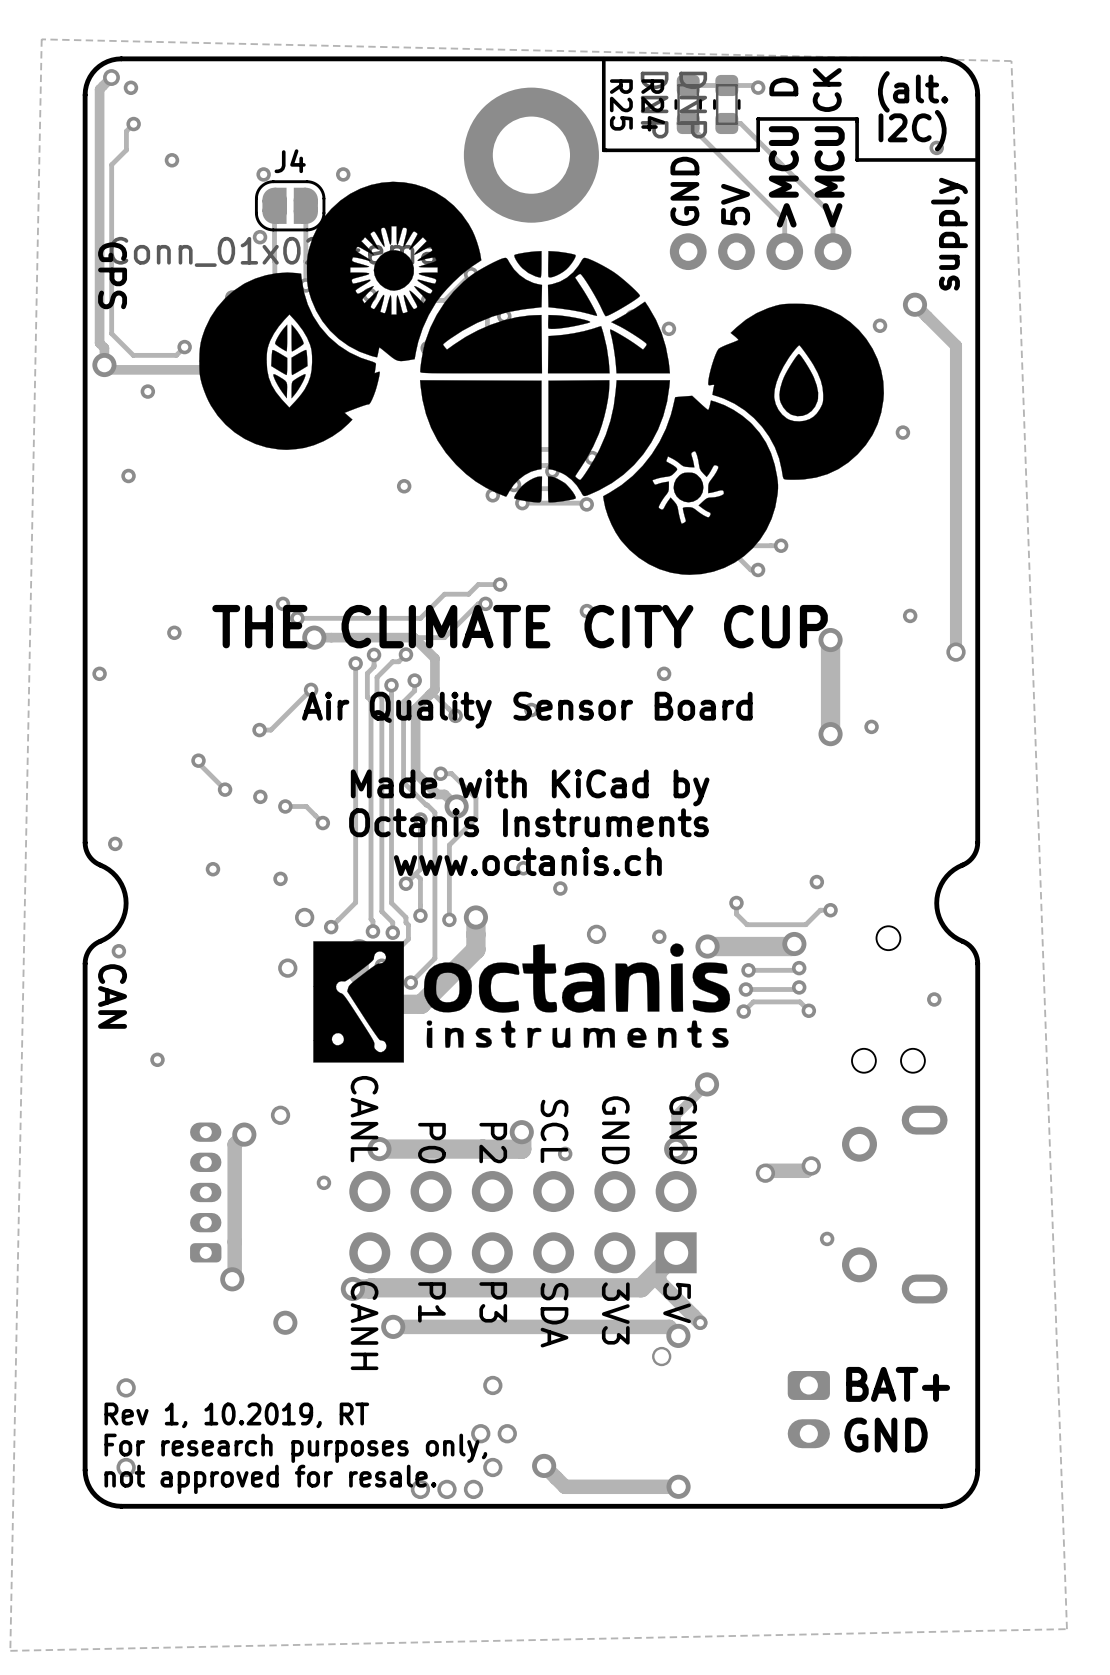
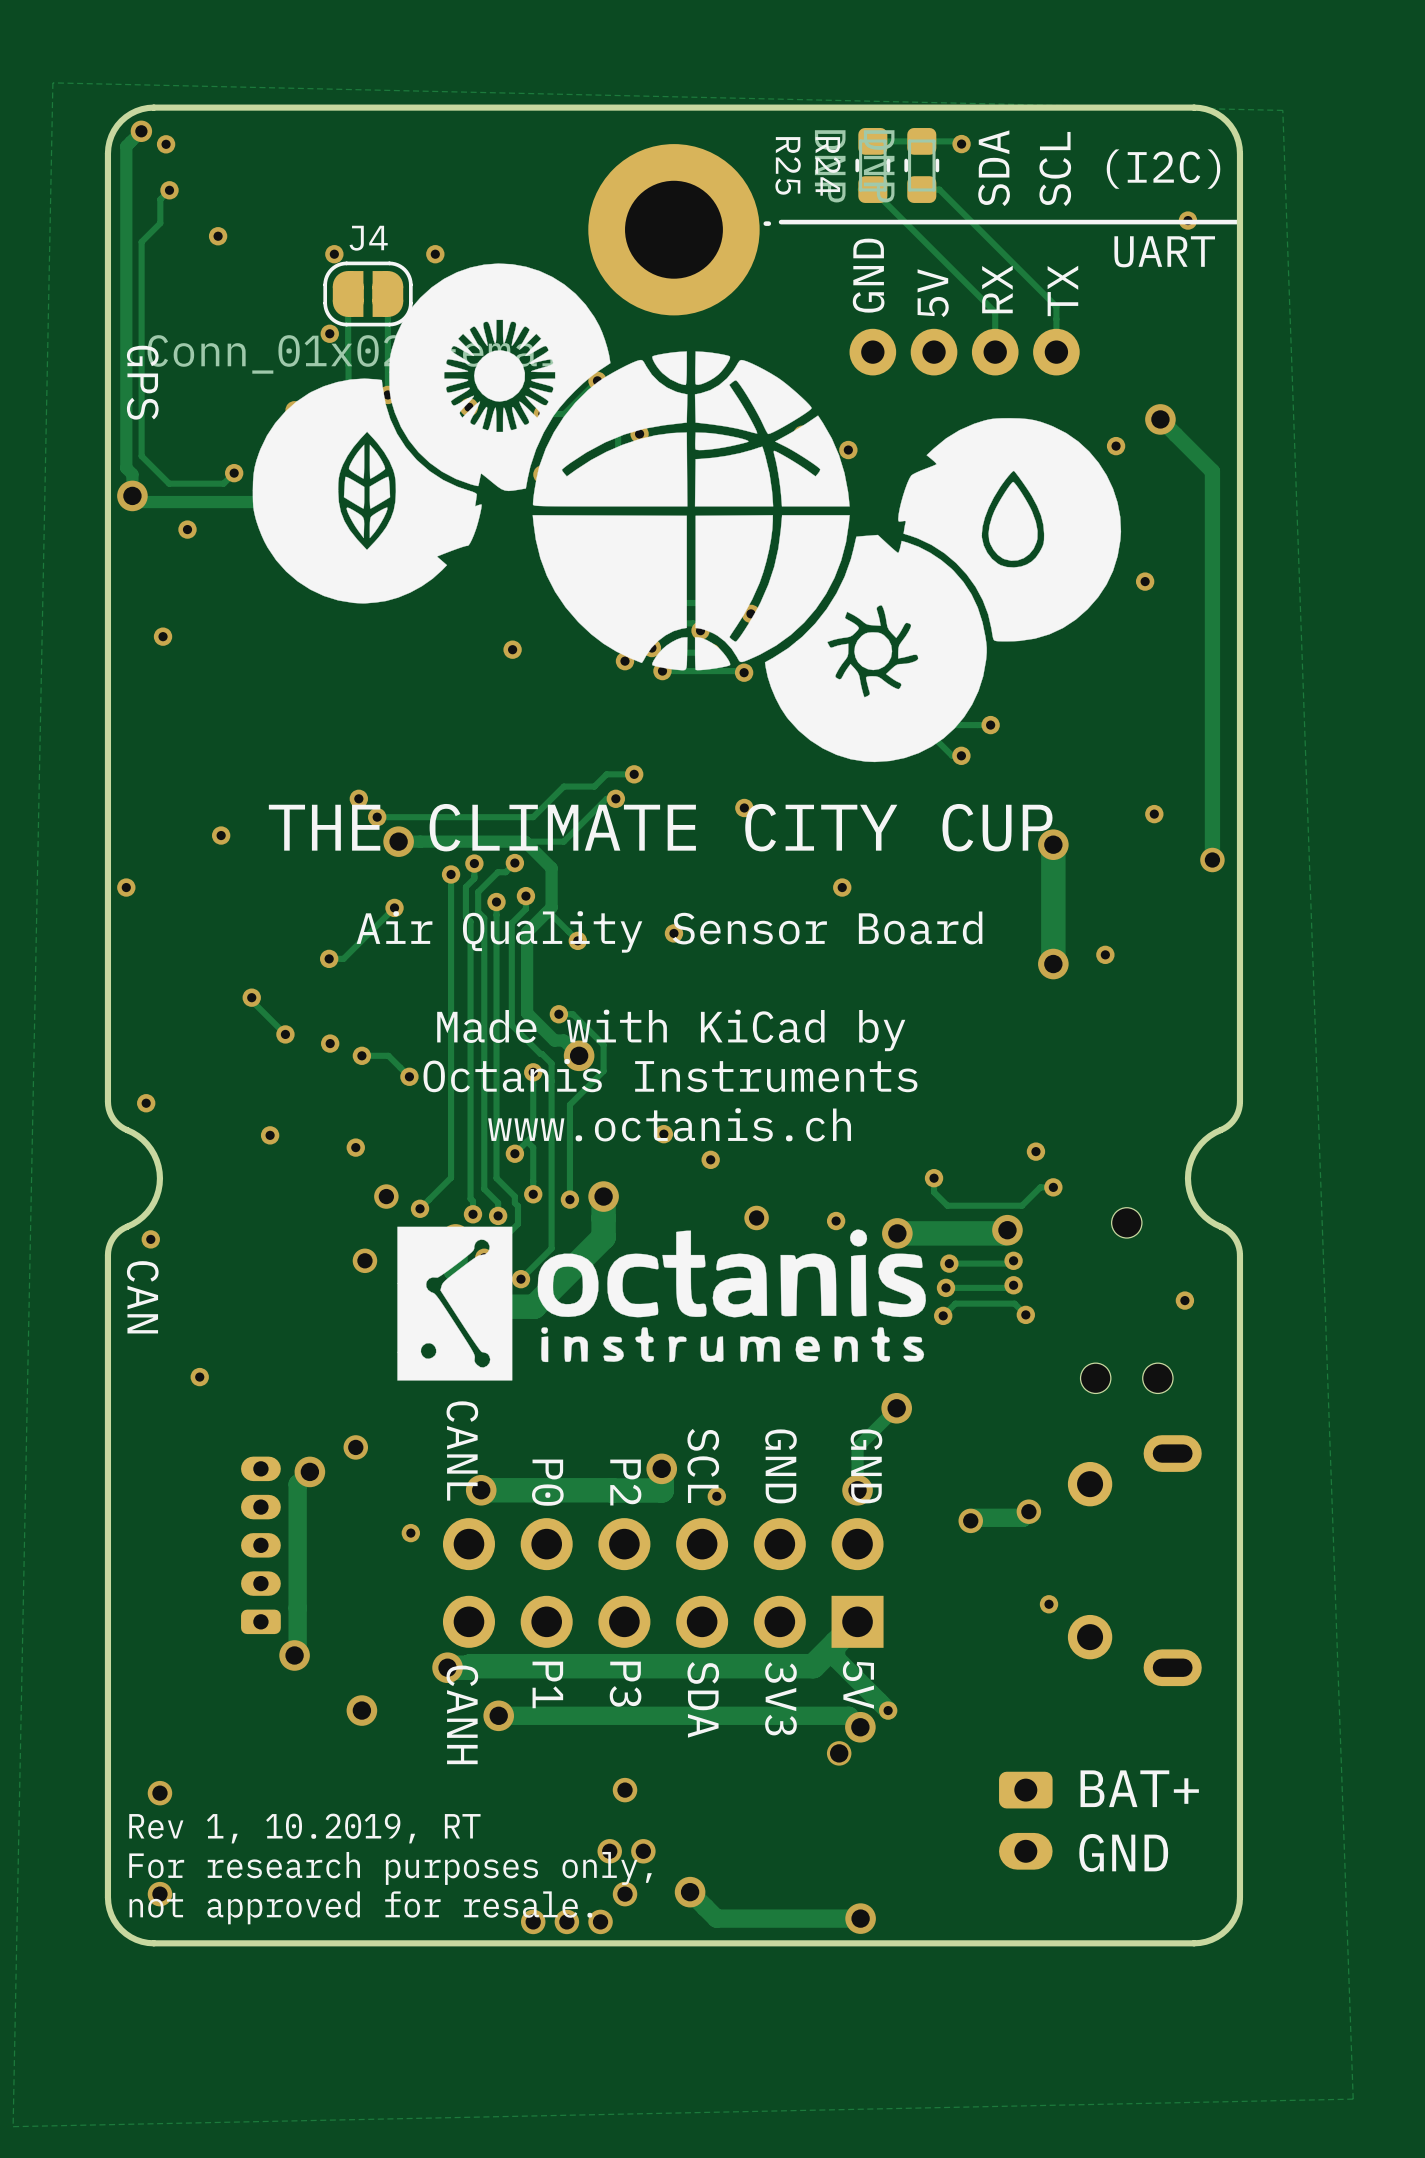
line: (603, 58) (603, 150) -> none
text: D (783, 87) -> SDA (994, 168)
text: CK (827, 90) -> SCL (1055, 168)
text: (alt. (913, 91) -> none
text: I2C) (912, 130) -> (I2C) (1163, 169)
line: none -> (1239, 222) (781, 222)
line: (606, 150) (758, 150) (758, 118) (857, 118) (857, 159) (975, 159) -> none
text: none -> UART (1164, 251)
text: >MCU (783, 176) -> none
text: <MCU (829, 176) -> none
text: none -> RX (997, 289)
text: none -> TX (1062, 290)
text: supply (949, 234) -> none

